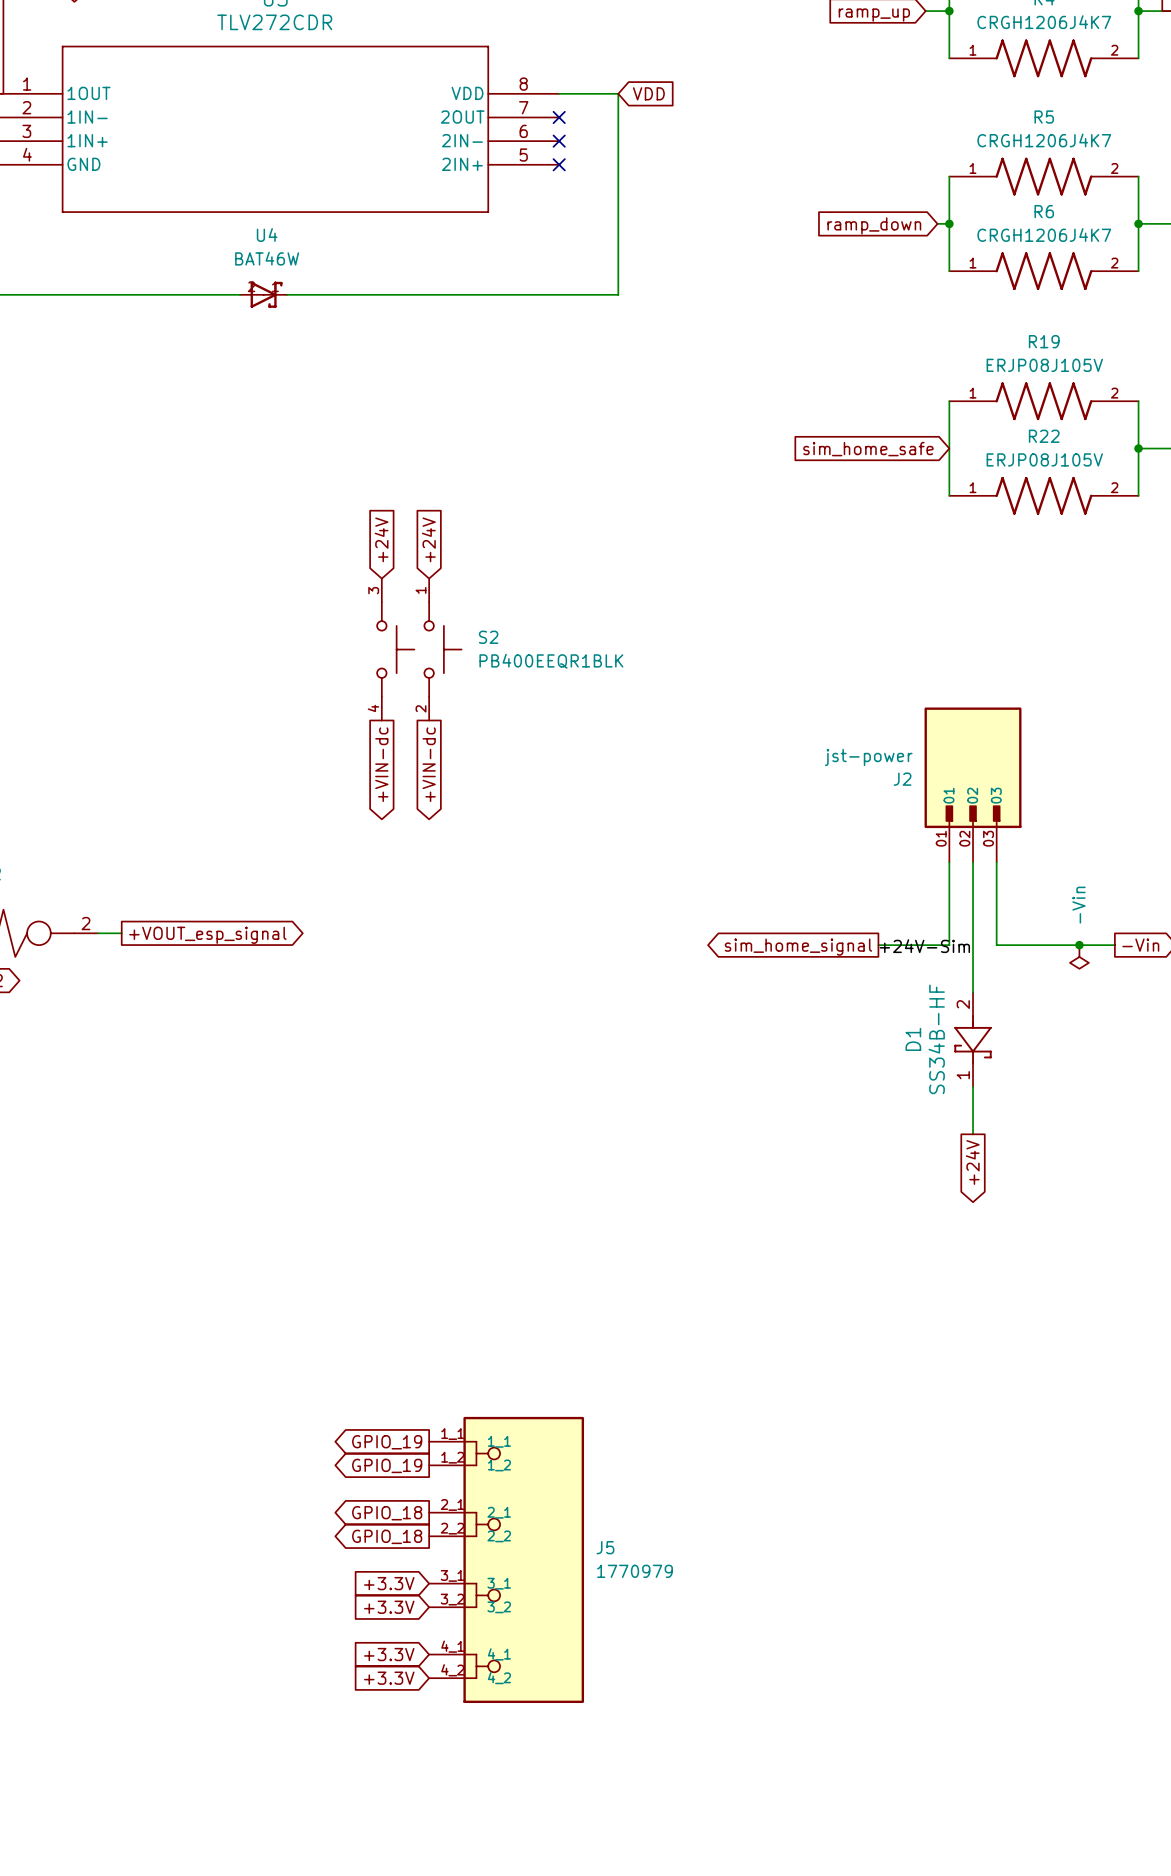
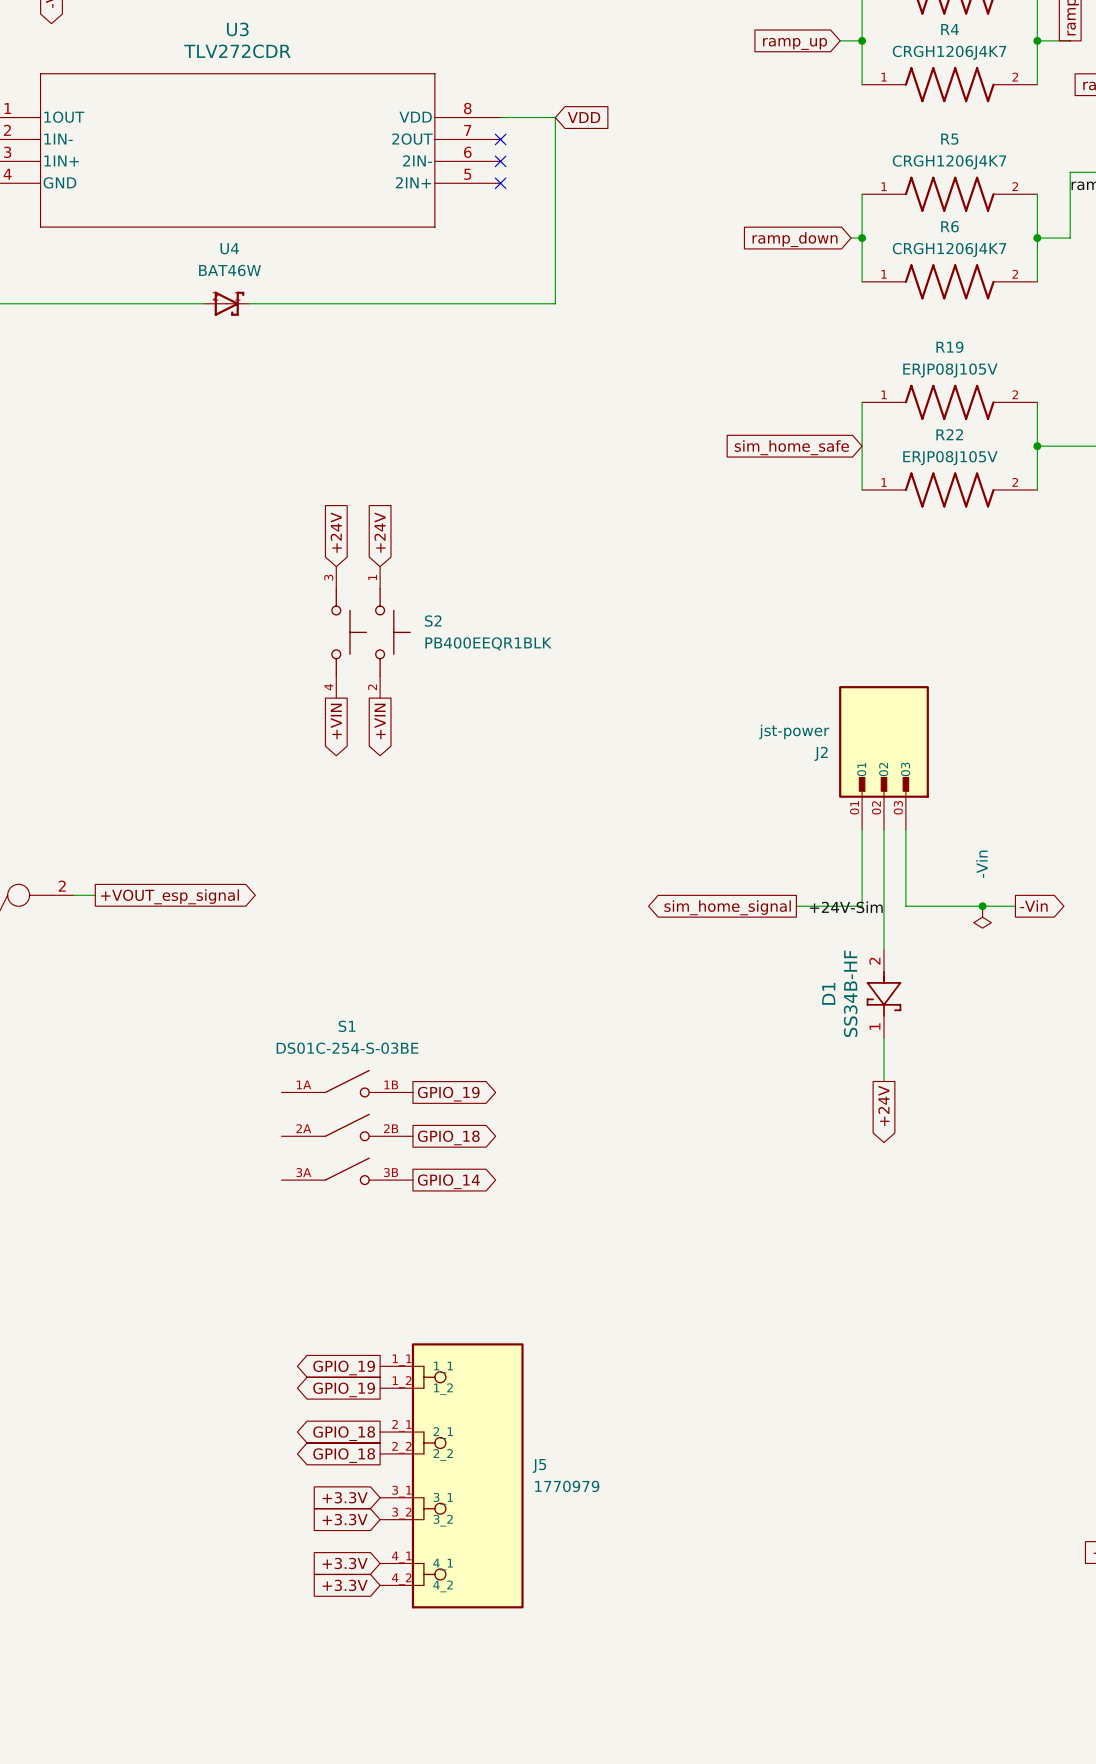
global label: +VIN-dc (381, 764) -> +VIN (336, 721)
global label: +VIN-dc (429, 764) -> +VIN (380, 721)
global label: none -> GPIO_19 (448, 1094)
S1: none -> DS01C-254-S-03BE (347, 1127)
global label: none -> GPIO_18 (448, 1137)
global label: none -> GPIO_14 (448, 1181)

